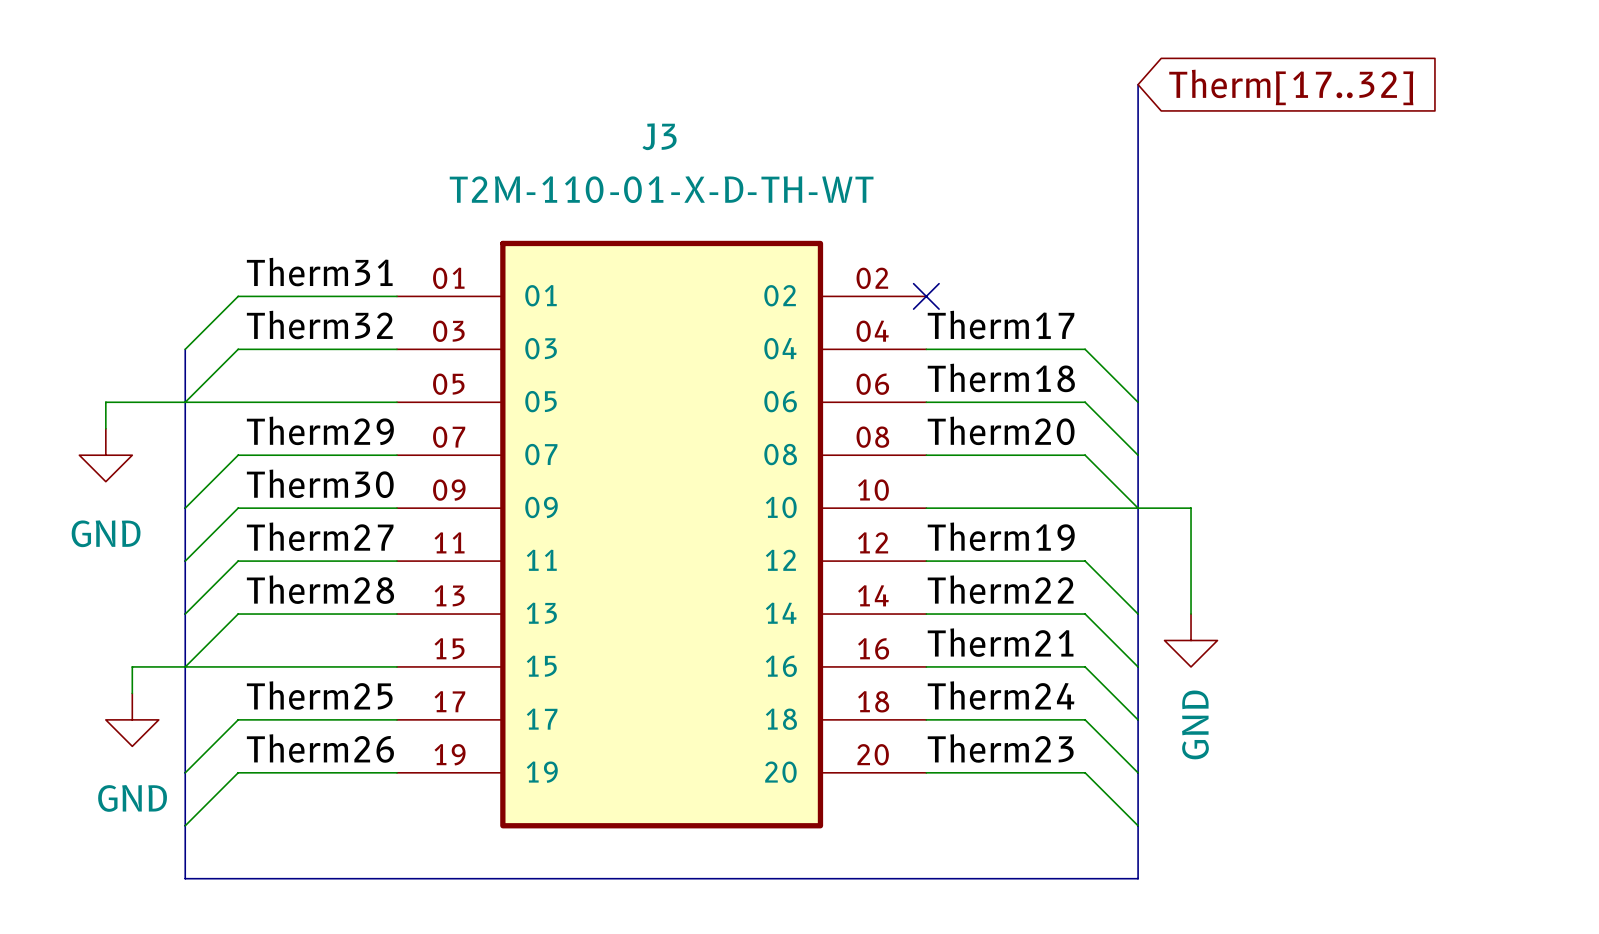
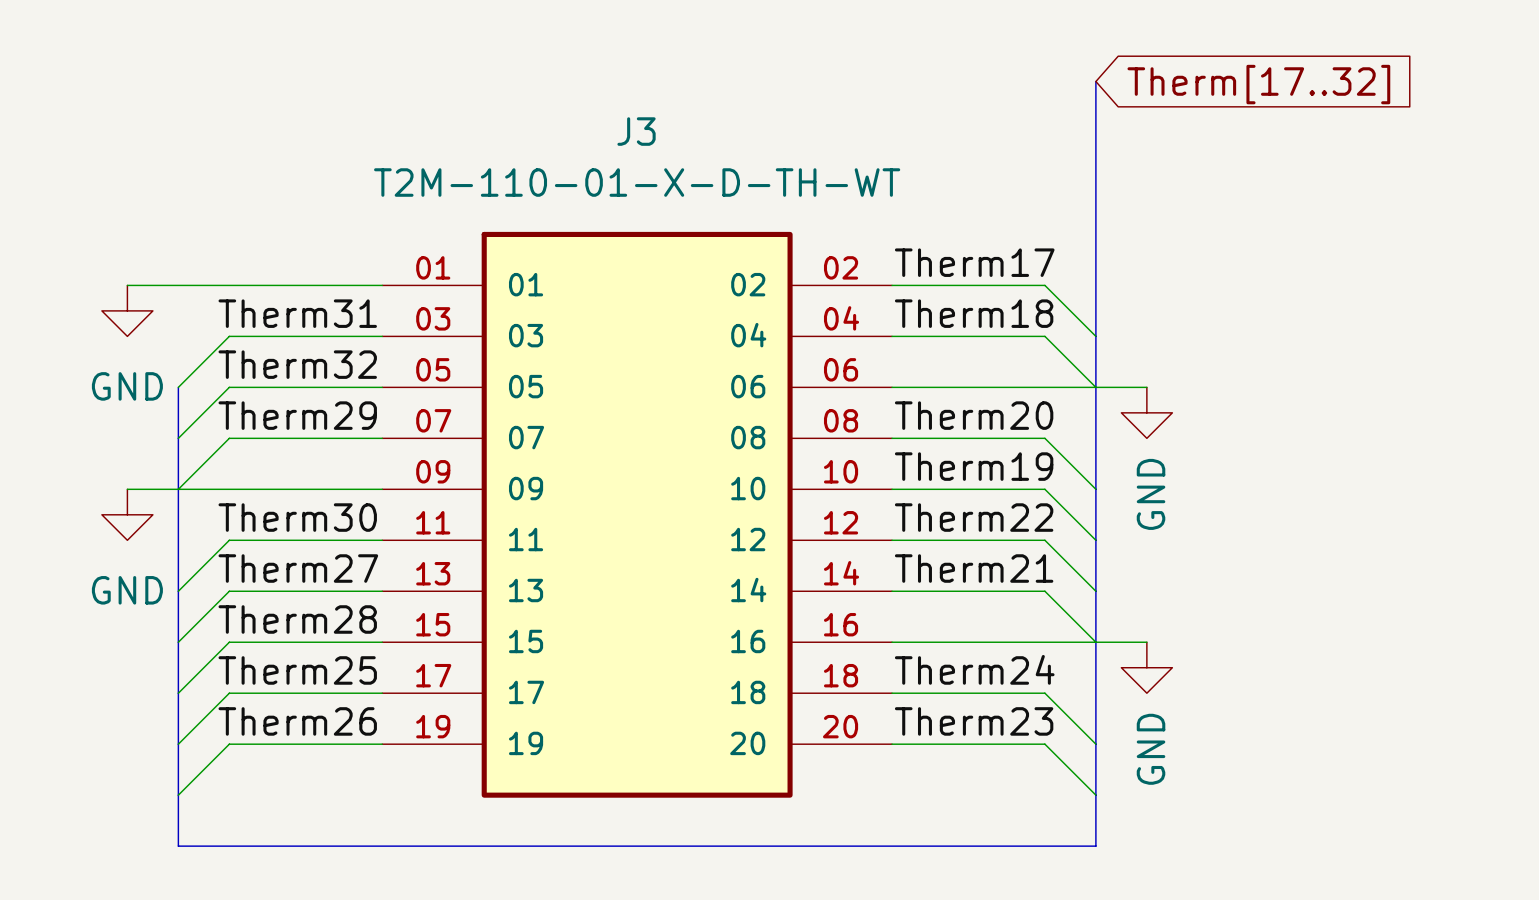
label: Therm31 (319, 272) -> none
label: none -> Therm17 (974, 262)
wire: (238, 296) (185, 349) -> (229, 285) (127, 285)
wire: none -> (892, 285) (1044, 285) (1095, 336)
no-connect mark: (926, 296) -> none
power symbol: none -> GND (127, 310)
label: Therm32 (319, 325) -> Therm31 (297, 313)
label: Therm17 (1001, 325) -> Therm18 (974, 313)
bus: (185, 349) (185, 402) -> none
label: none -> Therm32 (297, 364)
label: Therm18 (1001, 377) -> none
wire: (238, 402) (105, 402) (105, 428) -> (229, 387) (178, 438)
wire: (1085, 402) (1138, 455) -> (1044, 387) (1146, 387)
power symbol: none -> GND (1146, 412)
power symbol: GND (105, 455) -> none
label: Therm30 (320, 483) -> none
label: none -> Therm19 (974, 466)
wire: (238, 508) (185, 561) -> (229, 489) (127, 489)
wire: (1085, 508) (1191, 508) (1191, 614) -> (1044, 489) (1095, 540)
power symbol: none -> GND (127, 514)
label: Therm27 (320, 536) -> Therm30 (297, 517)
label: Therm19 (1001, 536) -> Therm22 (974, 517)
label: Therm28 (320, 589) -> Therm27 (298, 568)
label: Therm22 (1000, 589) -> Therm21 (974, 568)
power symbol position: GND (1191, 640) -> GND (1146, 667)
label: none -> Therm28 (297, 619)
label: Therm21 (1000, 642) -> none
wire: (238, 666) (132, 666) (132, 693) -> (229, 642) (178, 693)
wire: (1085, 666) (1138, 719) -> (1044, 642) (1146, 642)
power symbol: GND (132, 719) -> none

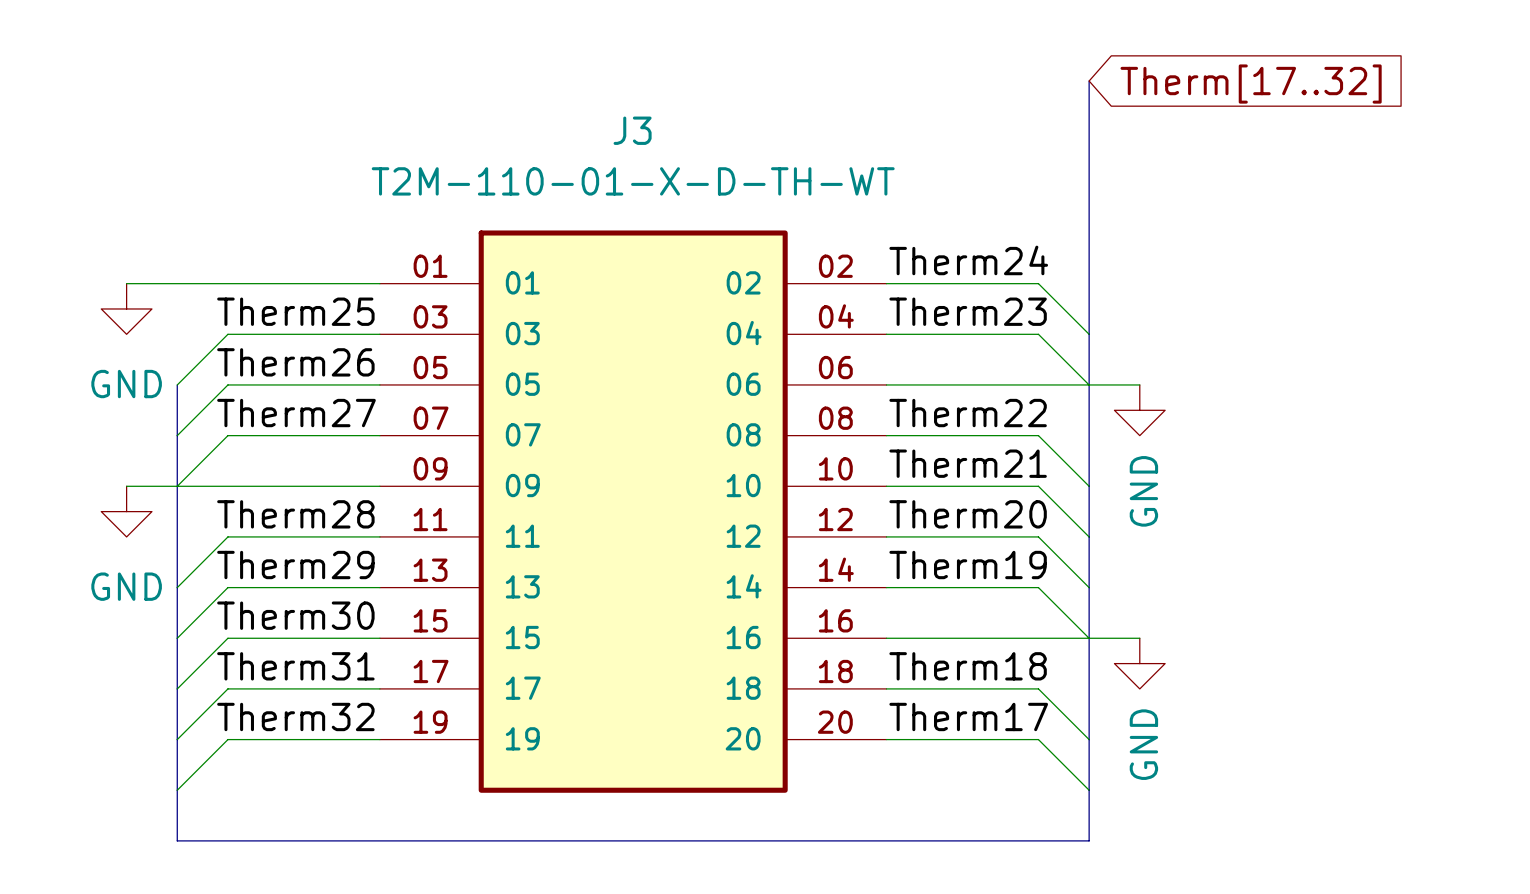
label: Therm17 (974, 262) -> Therm24 (968, 260)
label: Therm31 (297, 313) -> Therm25 (295, 311)
label: Therm18 (974, 313) -> Therm23 (968, 311)
label: Therm32 (297, 364) -> Therm26 (295, 362)
label: Therm29 (297, 415) -> Therm27 (296, 413)
label: Therm20 (974, 415) -> Therm22 (968, 413)
label: Therm19 (974, 466) -> Therm21 (968, 463)
label: Therm30 (297, 517) -> Therm28 (295, 514)
label: Therm22 (974, 517) -> Therm20 (968, 514)
label: Therm27 (298, 568) -> Therm29 (295, 565)
label: Therm21 (974, 568) -> Therm19 (968, 565)
label: Therm28 (297, 619) -> Therm30 (295, 615)
label: Therm24 (974, 669) -> Therm18 (968, 666)
label: Therm25 (297, 670) -> Therm31 (295, 666)
label: Therm26 (297, 721) -> Therm32 (295, 716)
label: Therm23 (974, 721) -> Therm17 (968, 716)

